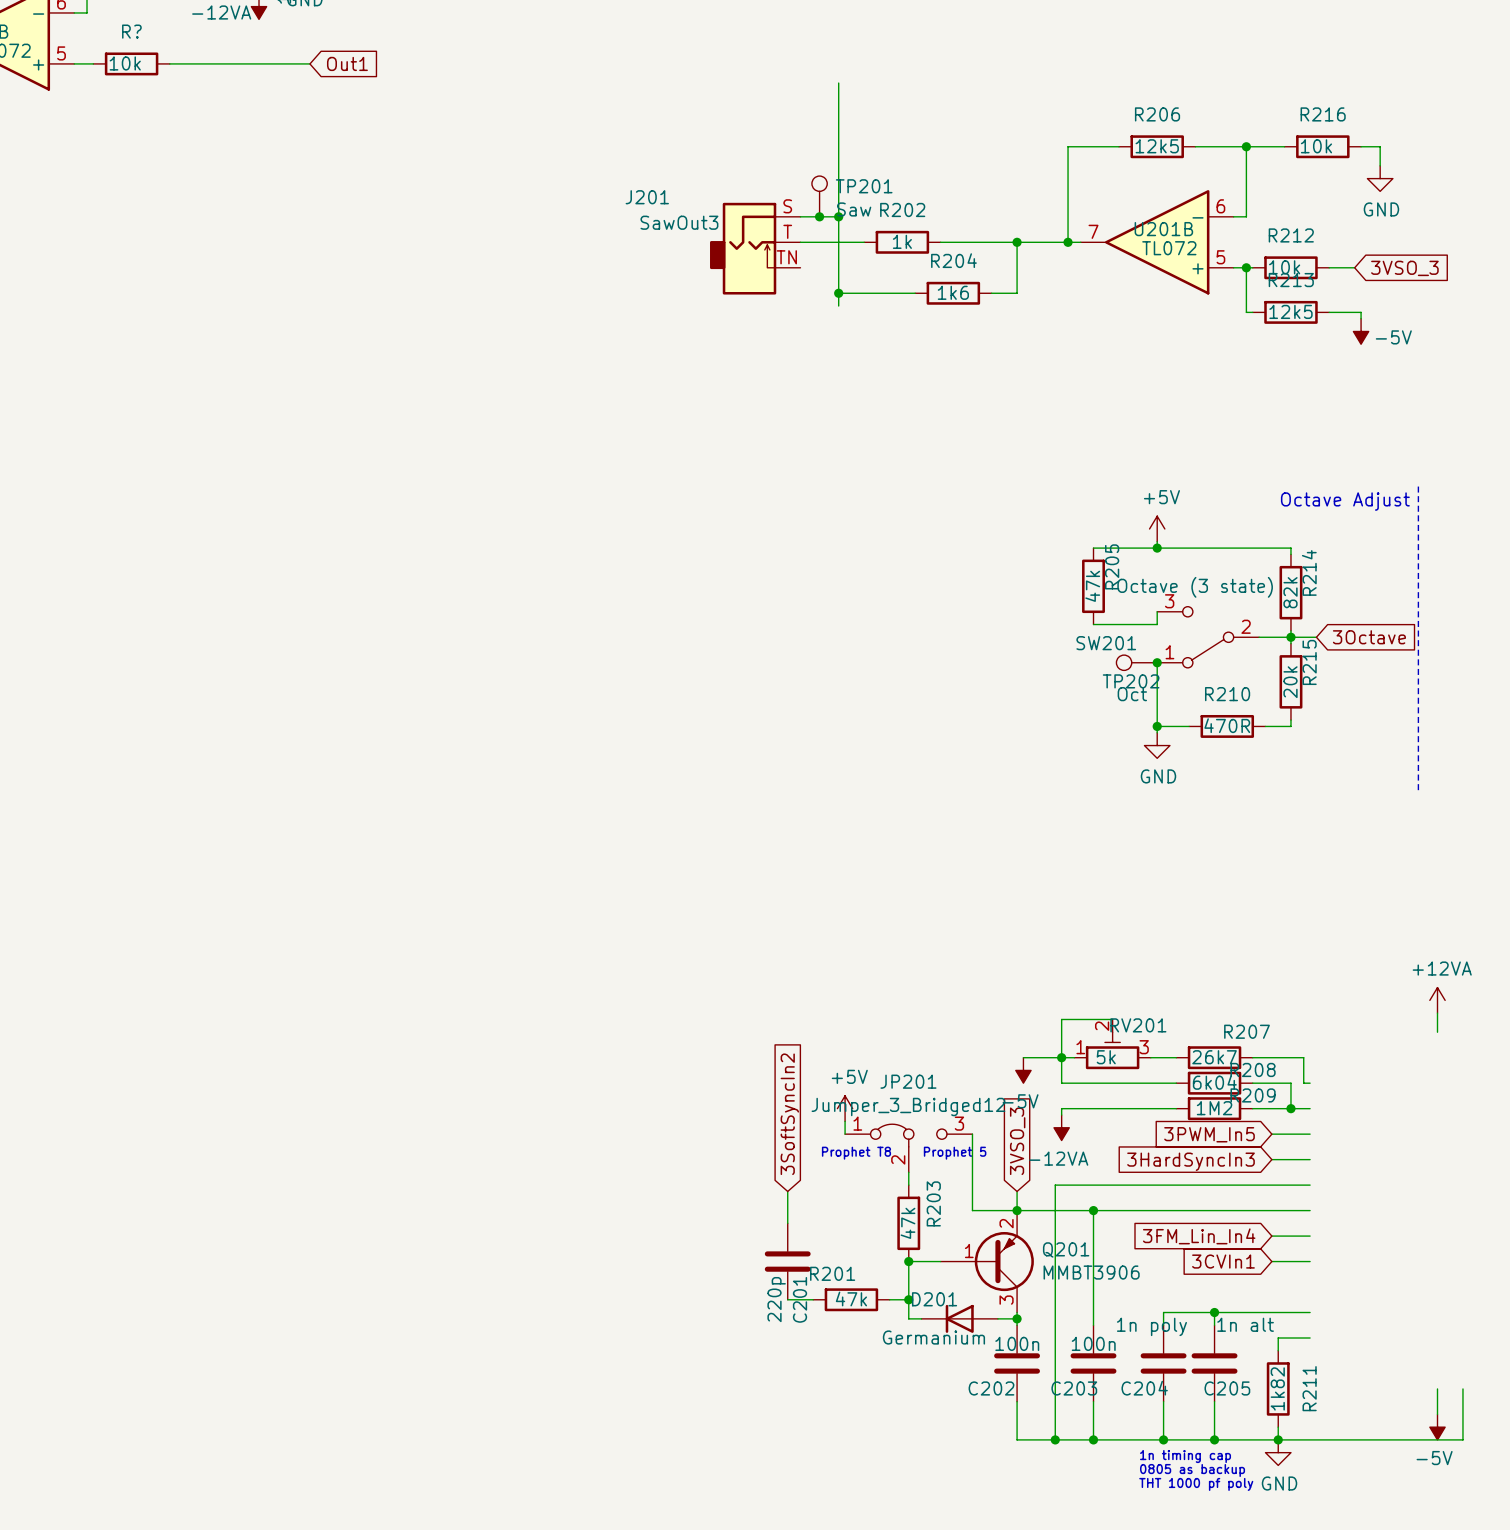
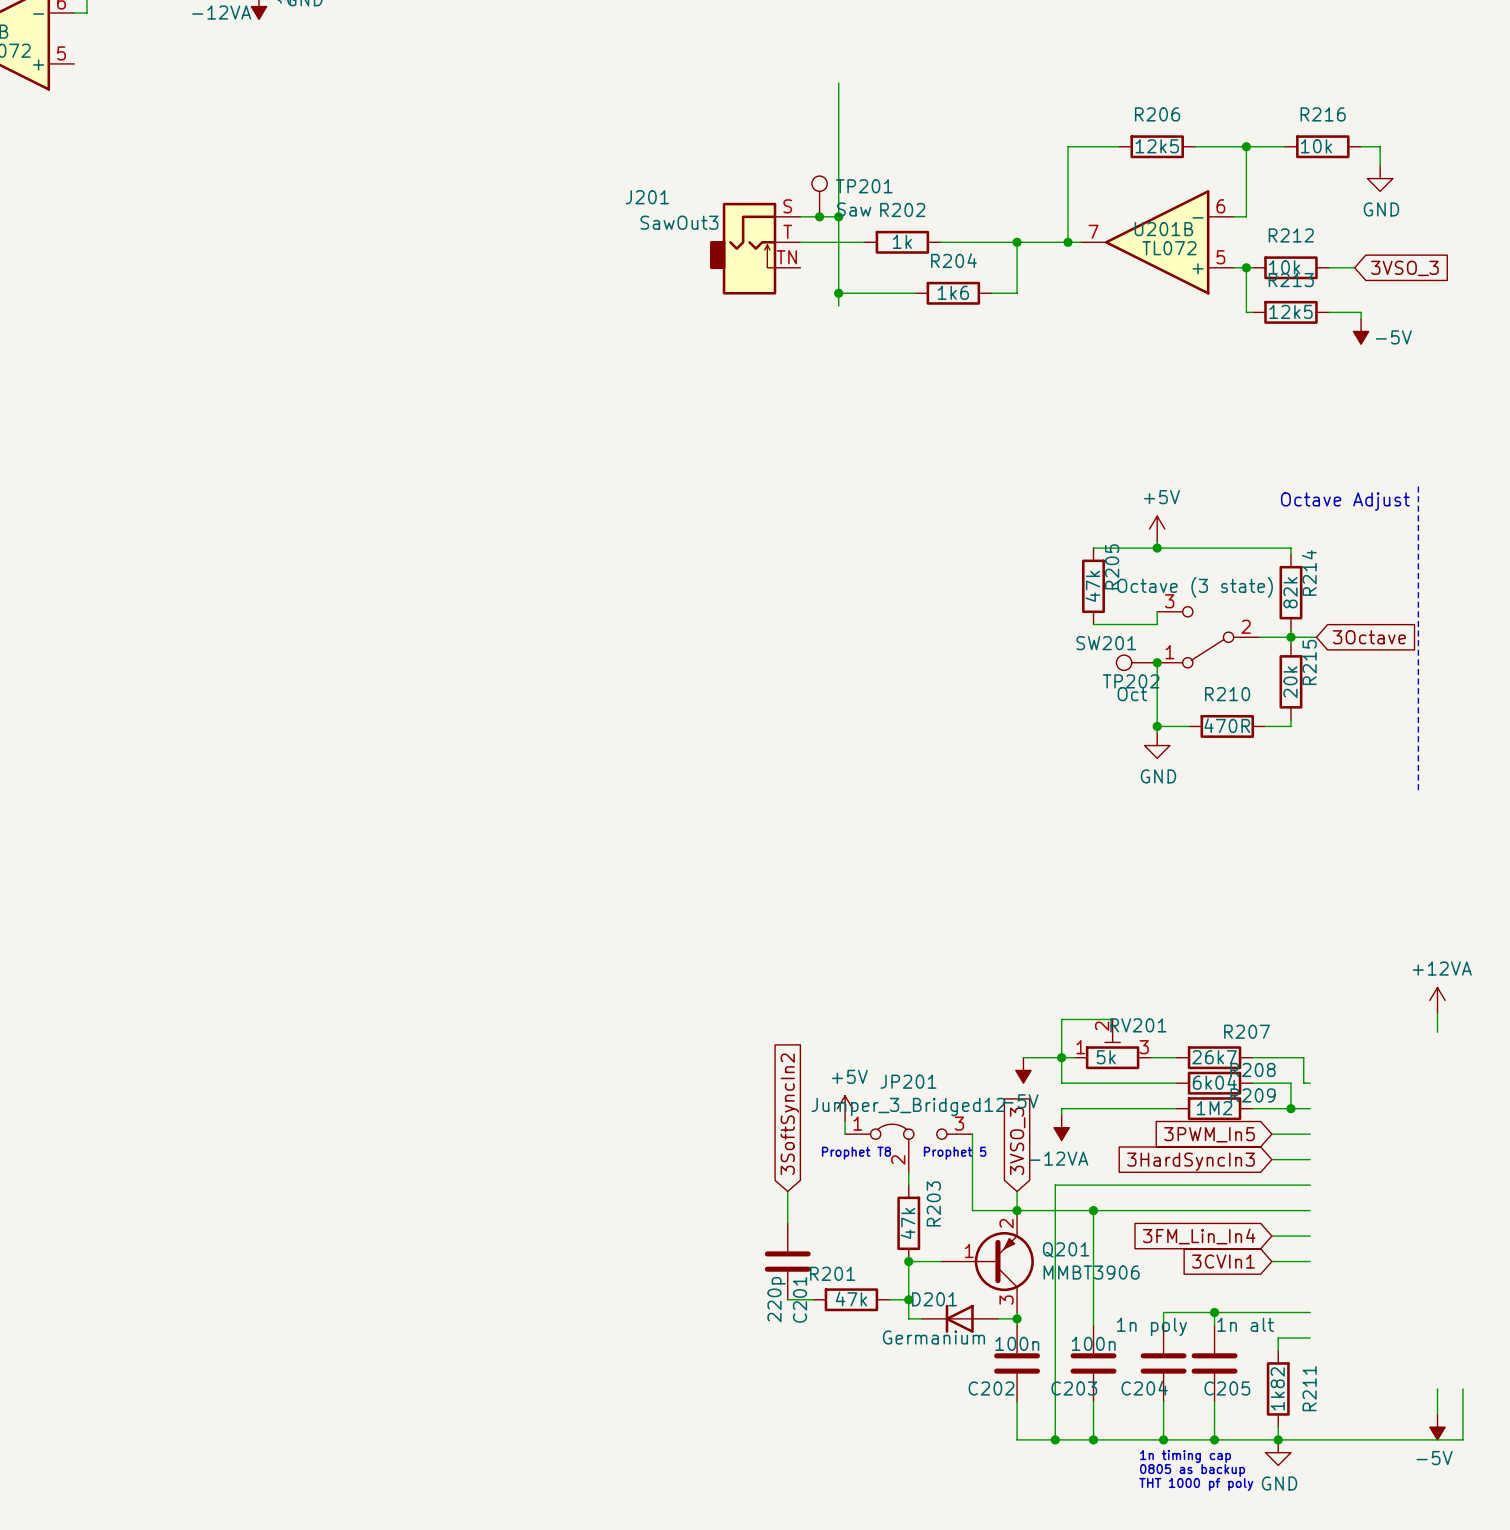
wire: (74, 63) (93, 63) -> none
R?: 10k (131, 63) -> none
wire: (169, 63) (309, 63) -> none
global label: Out1 (347, 63) -> none

